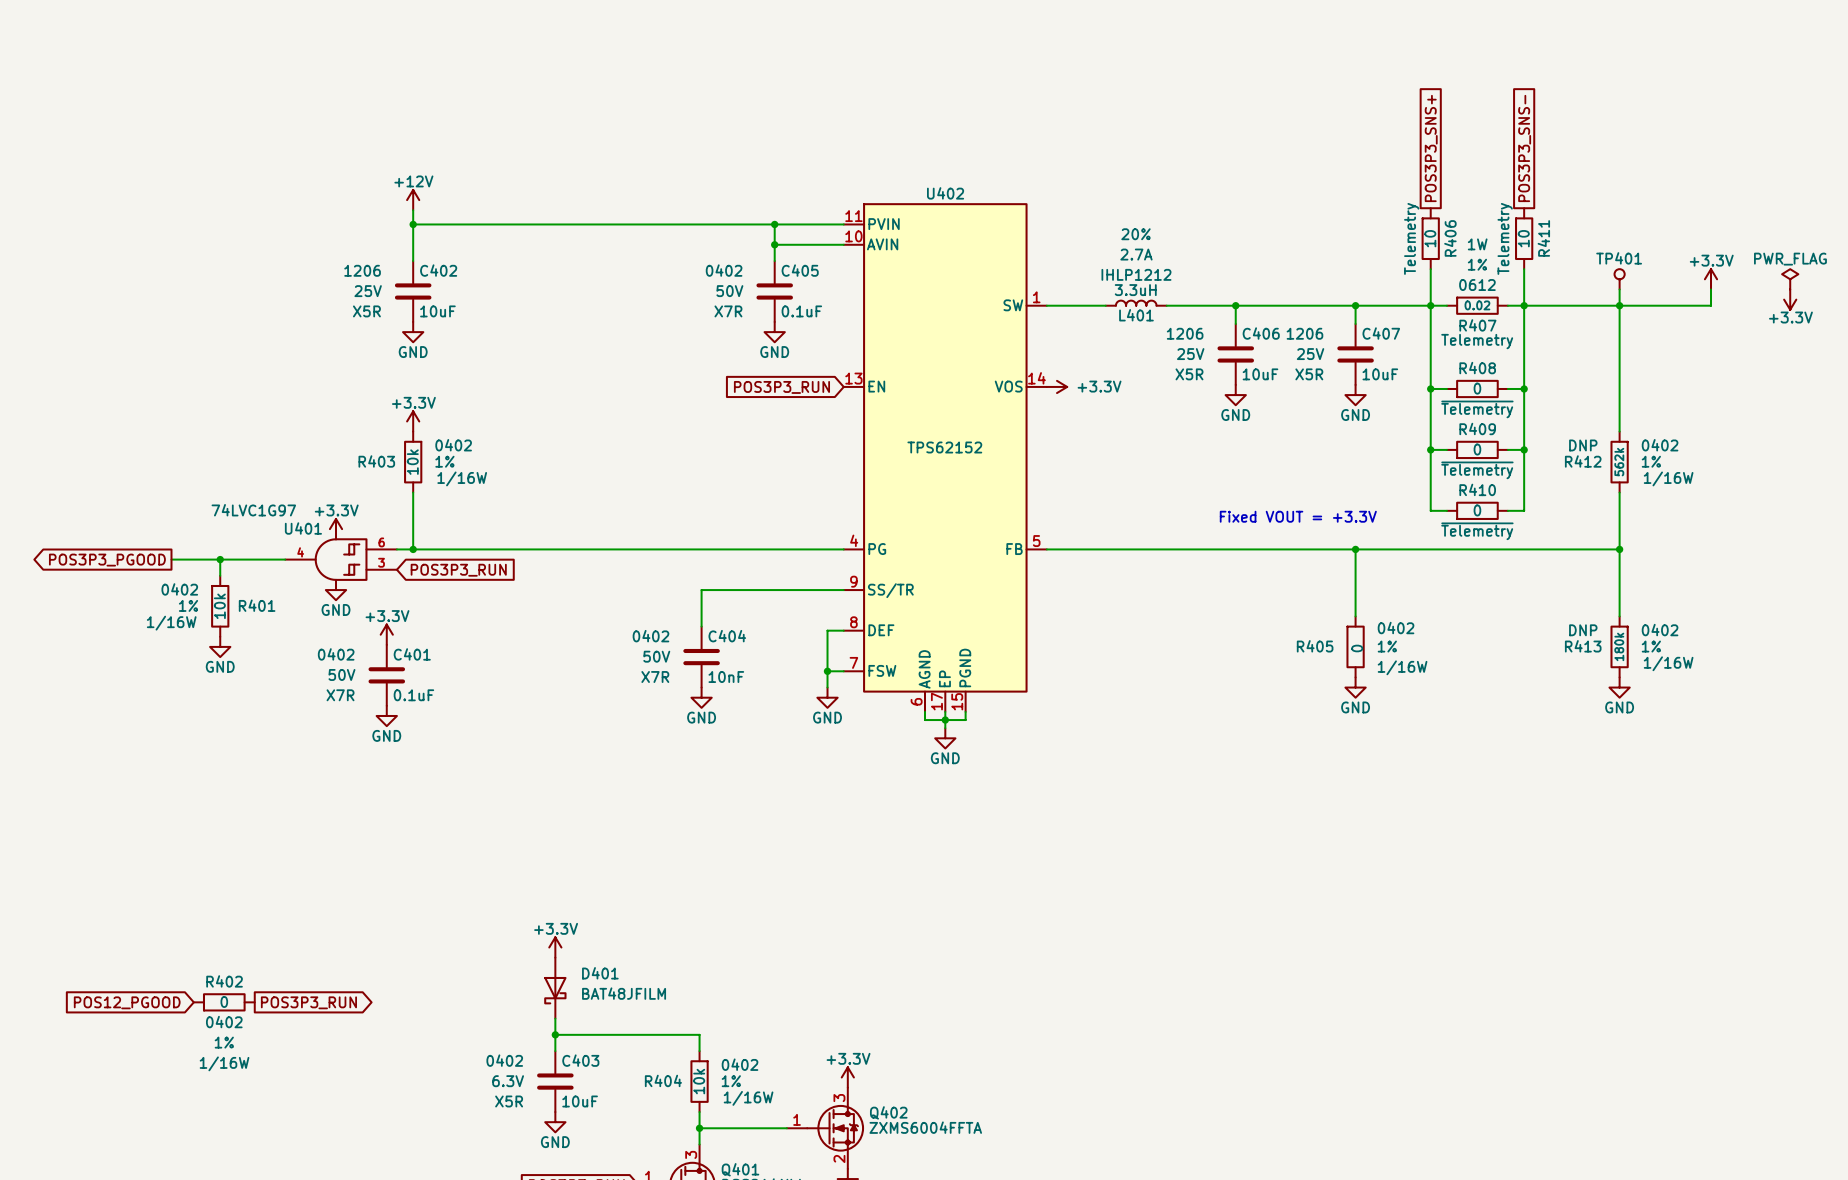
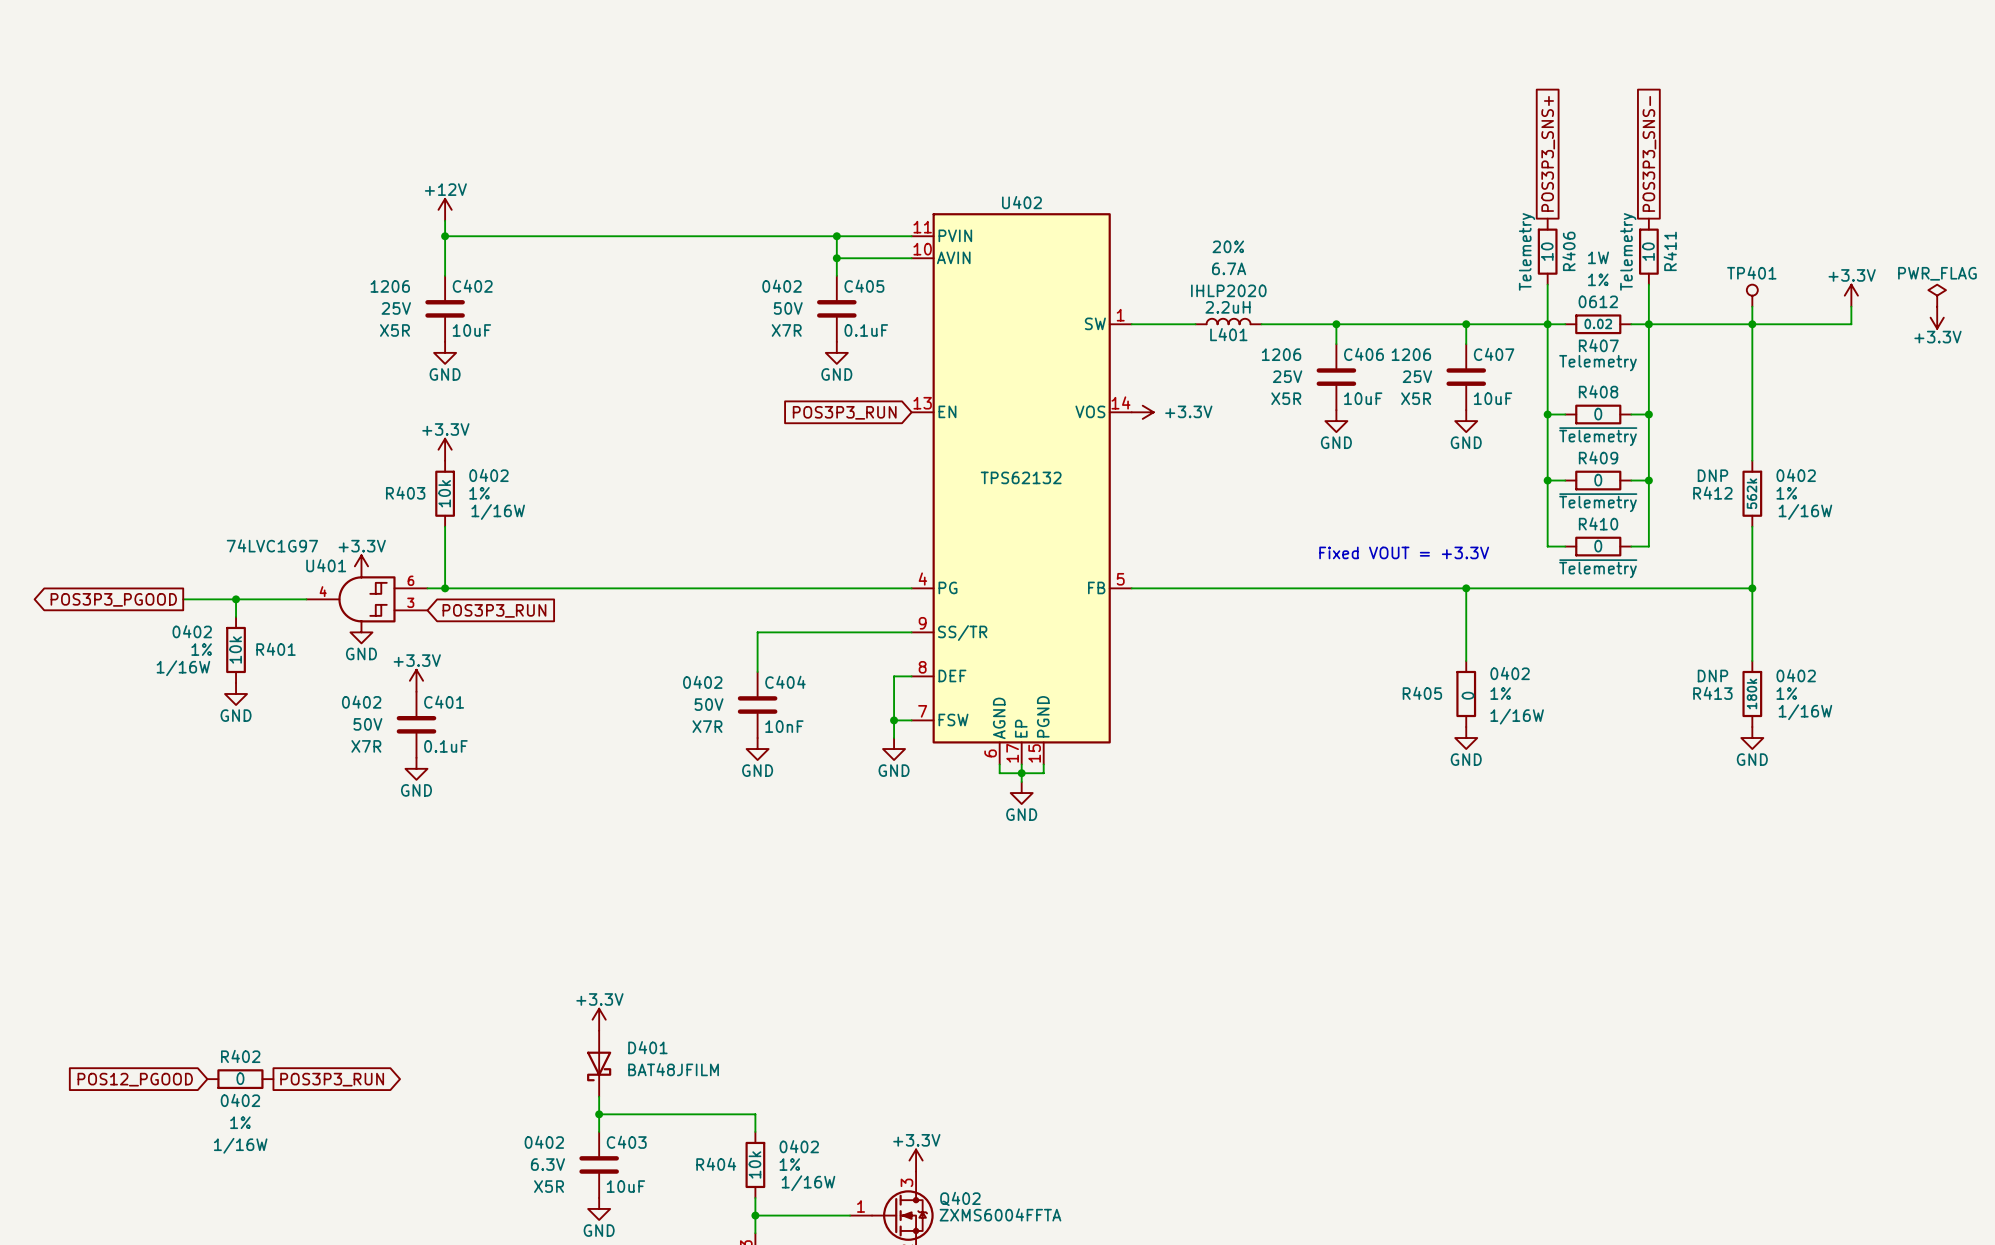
L401 text: 2.7A (1136, 254) -> 6.7A (1229, 268)
L401 text: IHLP1212 (1136, 274) -> IHLP2020 (1228, 290)
L401 value: 3.3uH (1135, 290) -> 2.2uH (1228, 307)
U402 value: TPS62152 (944, 447) -> TPS62132 (1021, 477)

